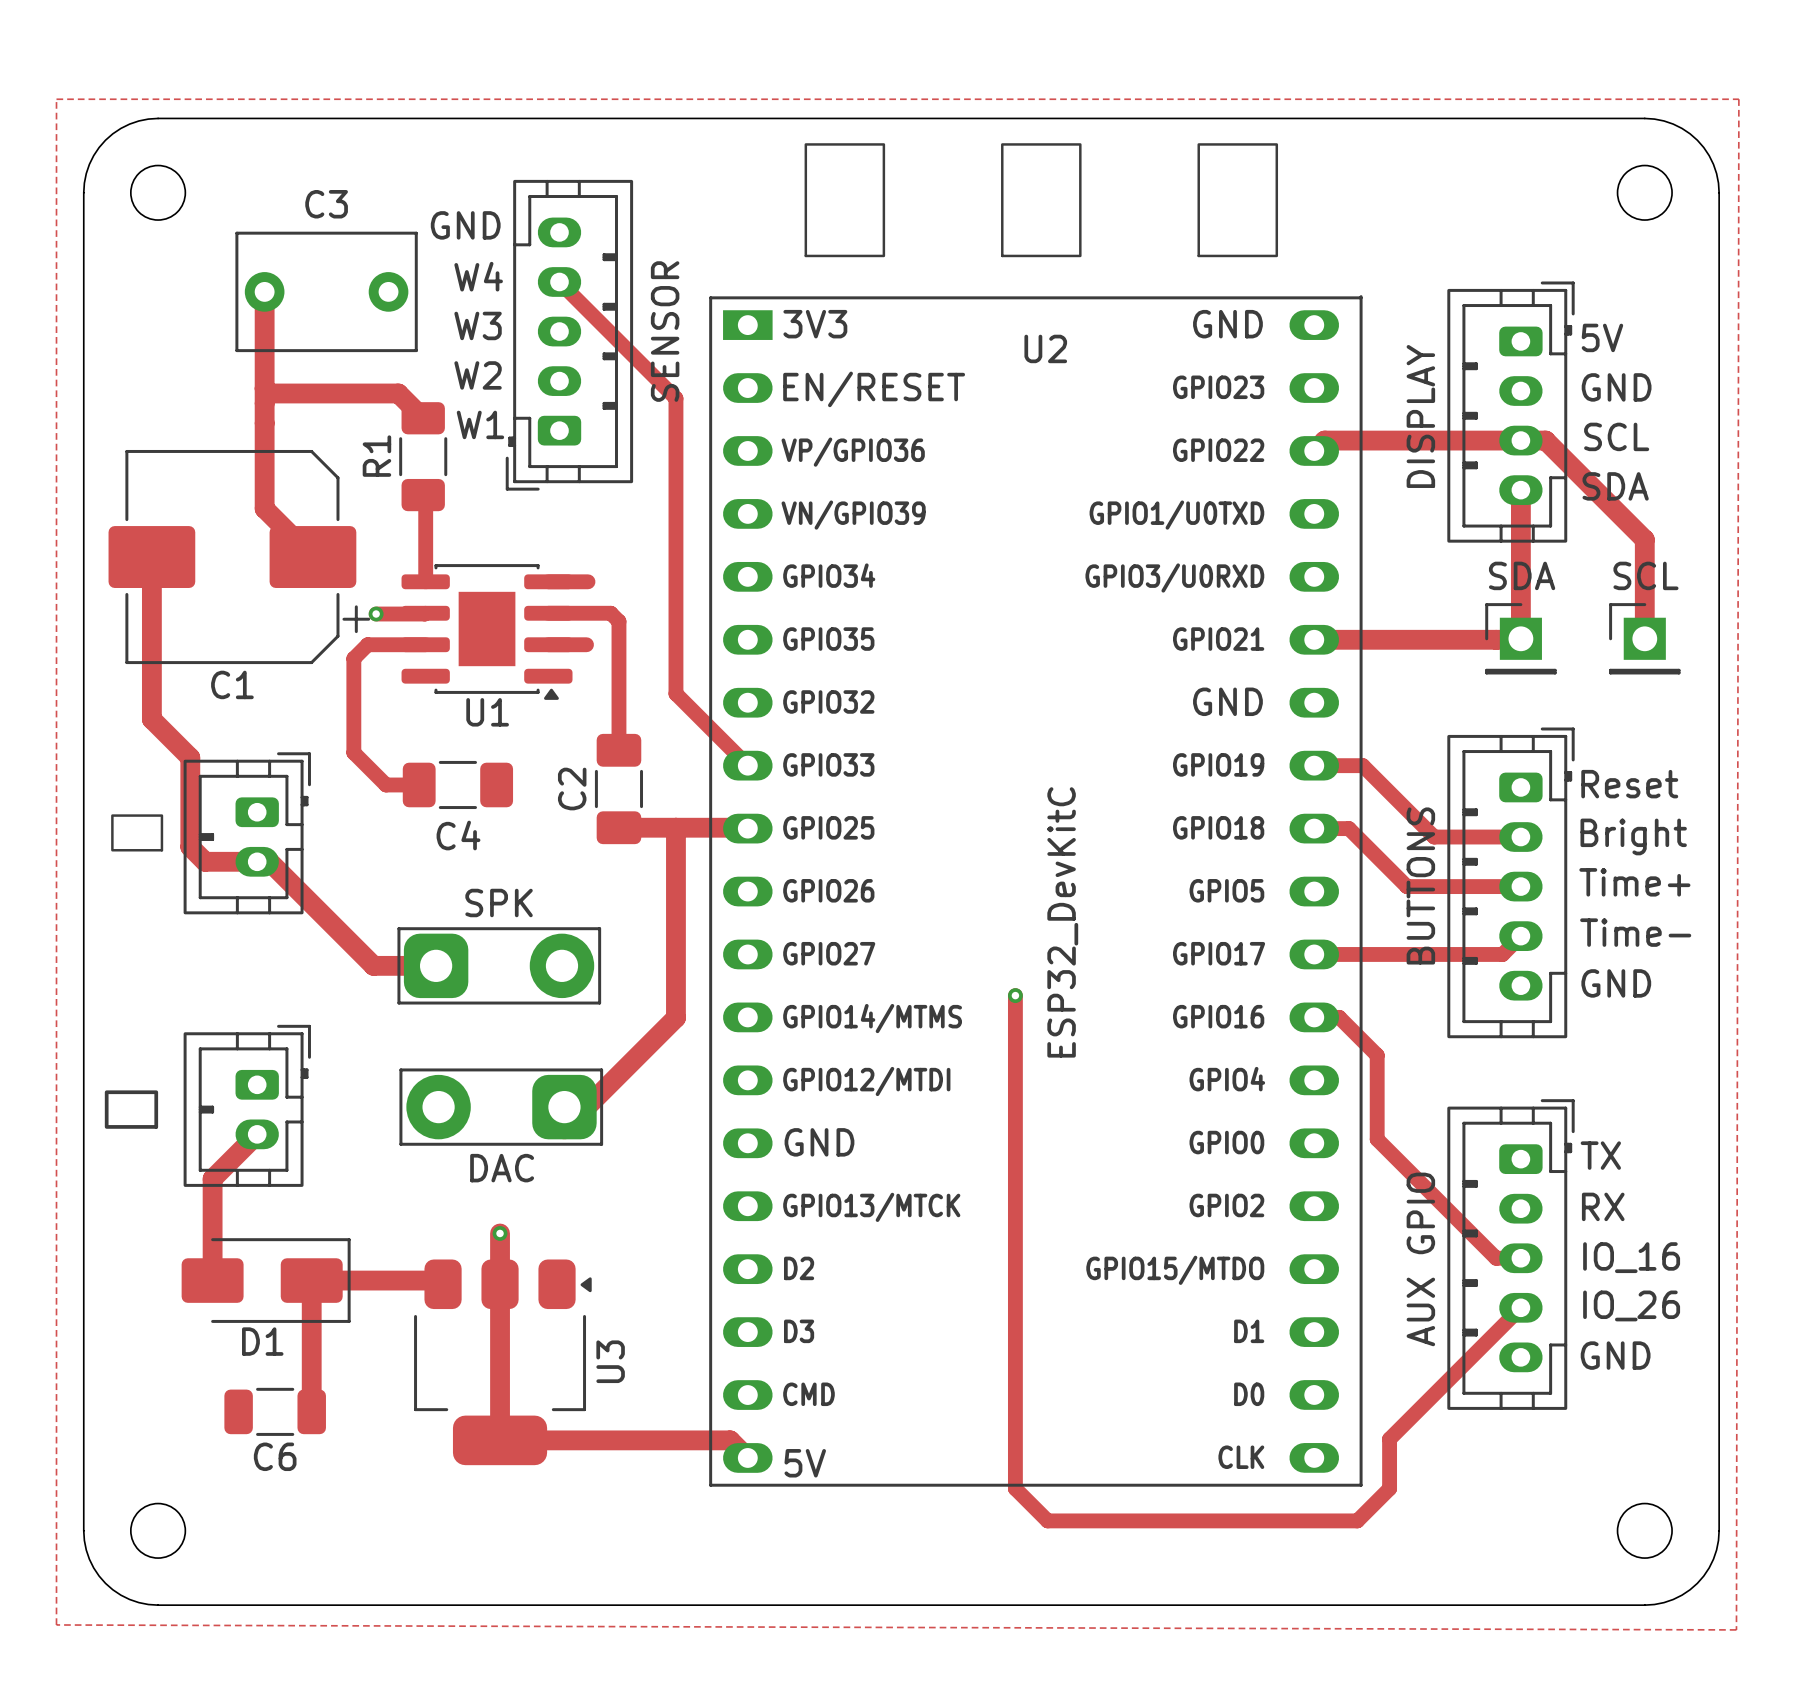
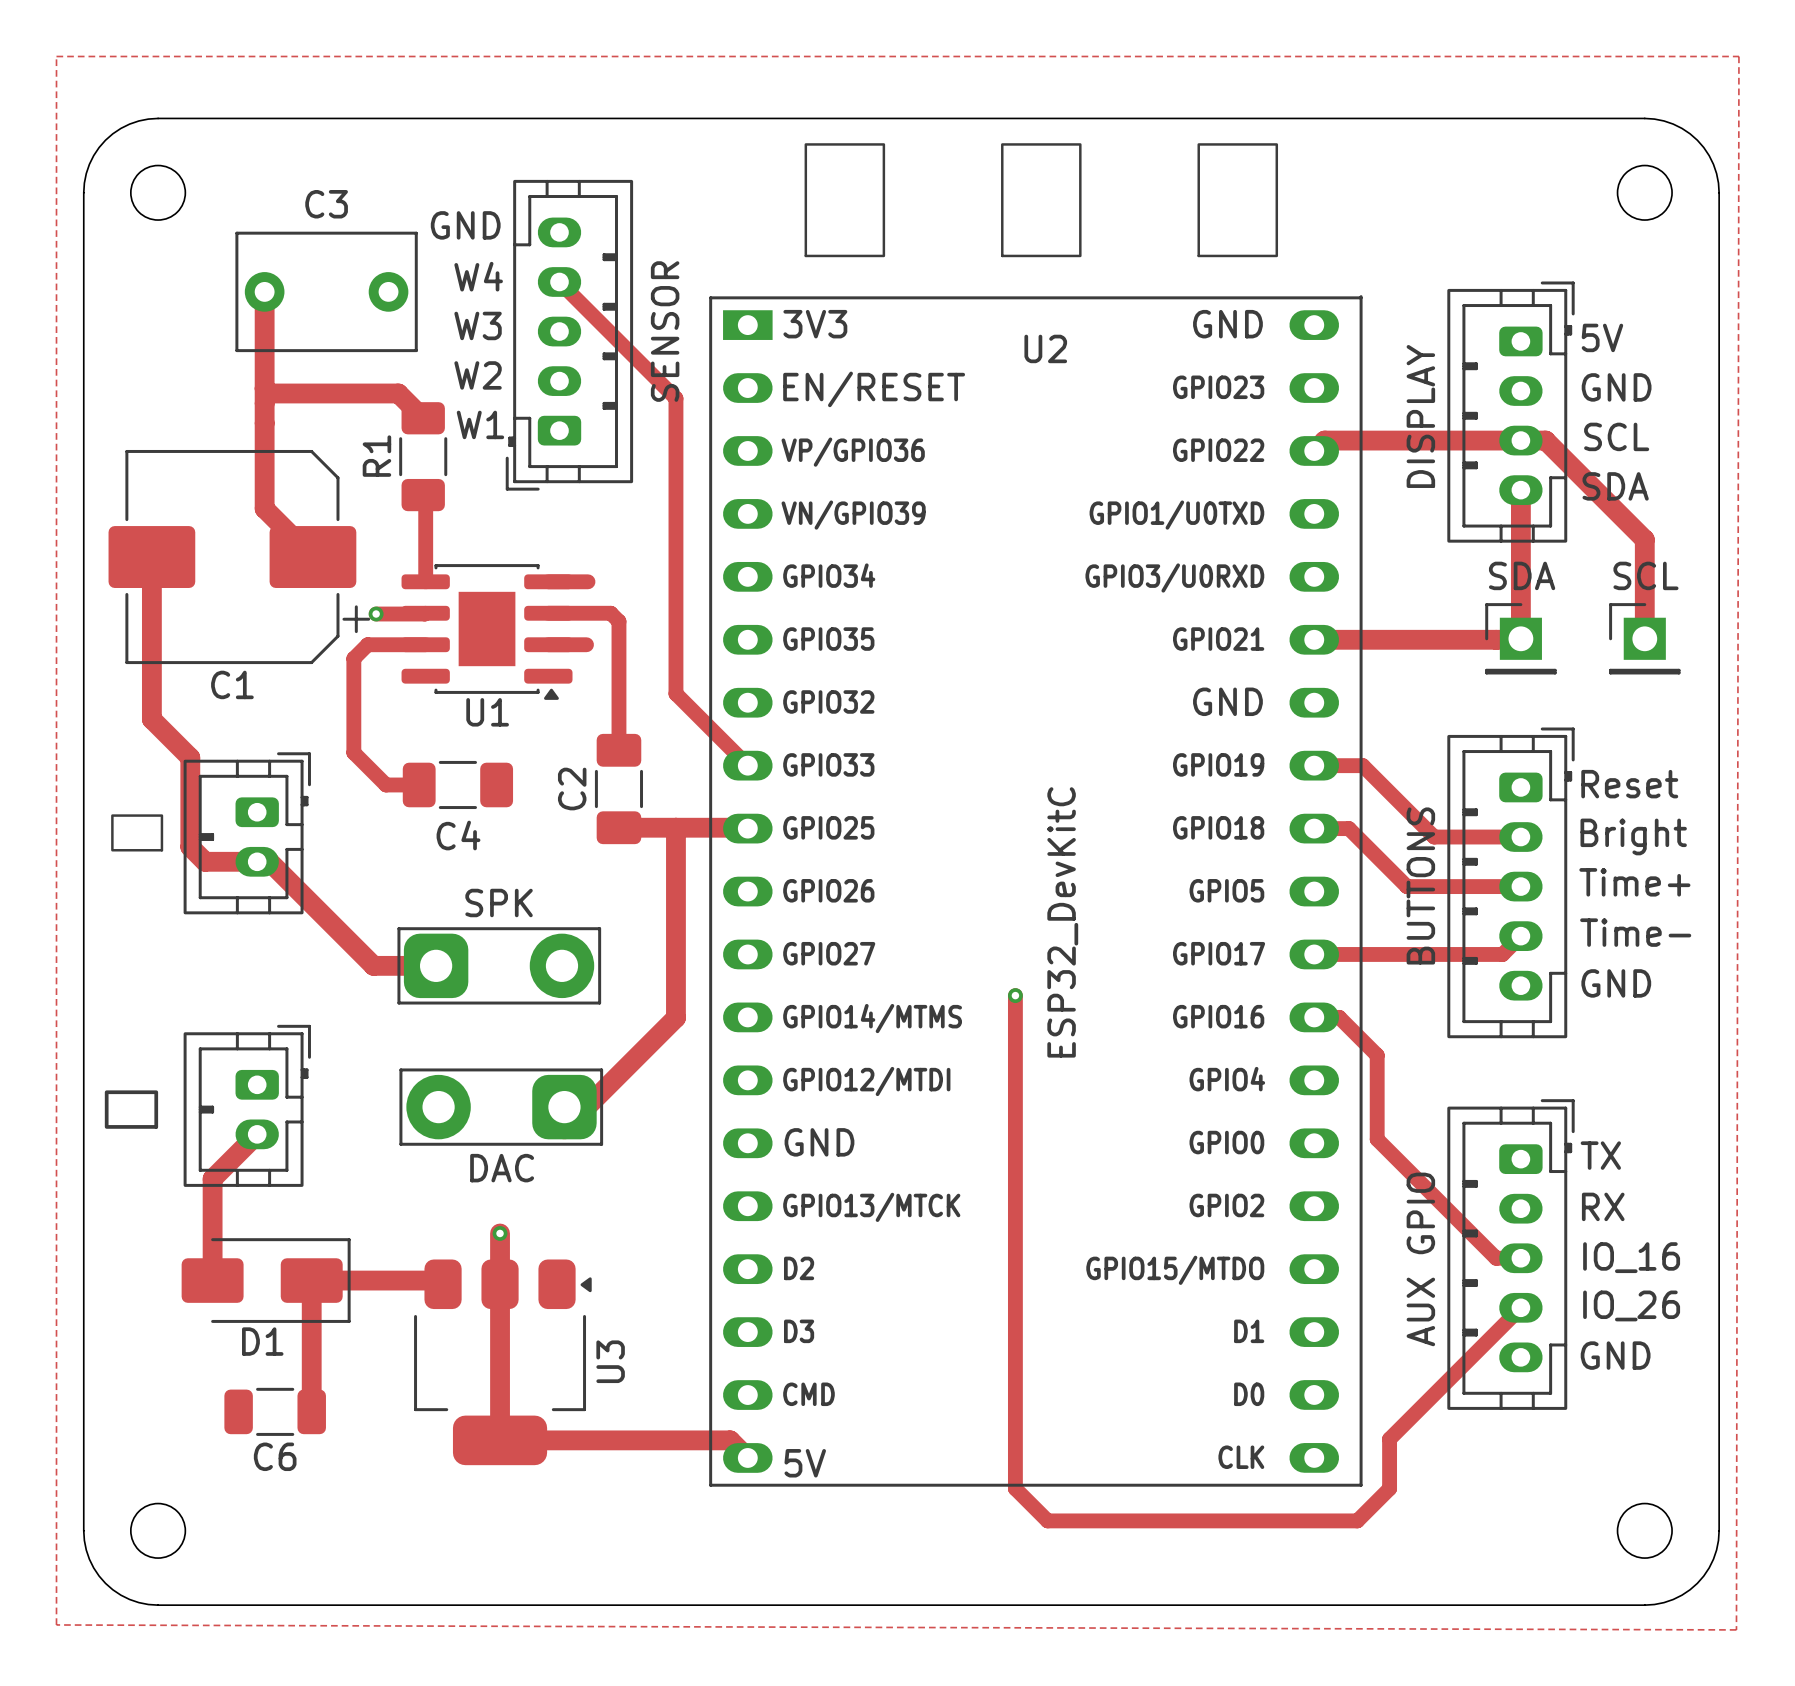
zone outline: (56, 99) (1738, 99) -> (56, 99) (56, 56) (1738, 56) (1738, 99)

